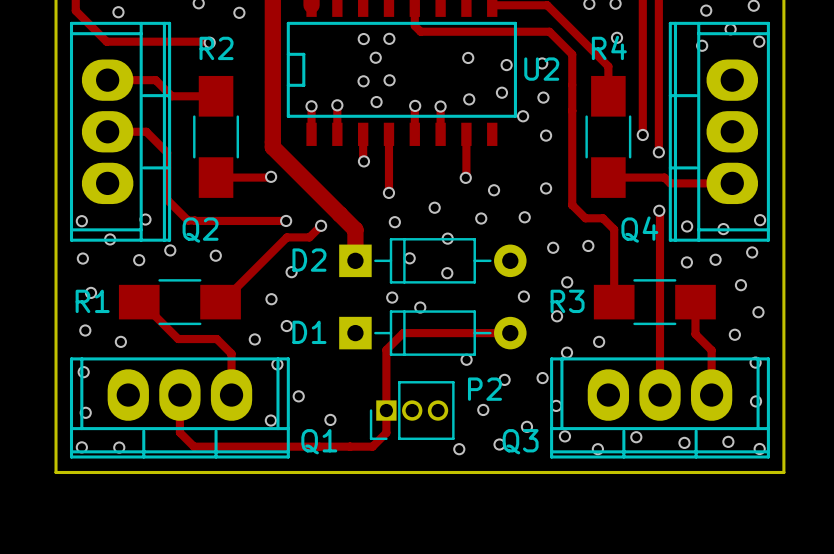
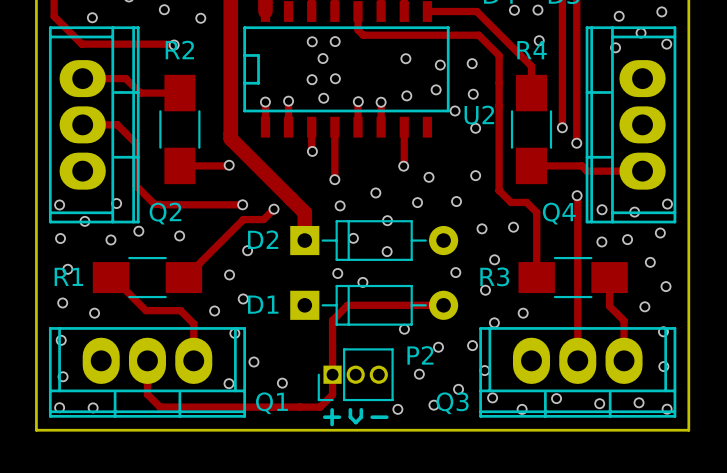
U2 name position: U2 (541, 69) -> U2 (479, 115)
line: none -> (332, 409) (332, 424)
line: none -> (350, 409) (350, 417) (355, 422) (361, 417) (361, 409)
line: none -> (324, 417) (339, 417)
line: none -> (372, 417) (386, 417)

